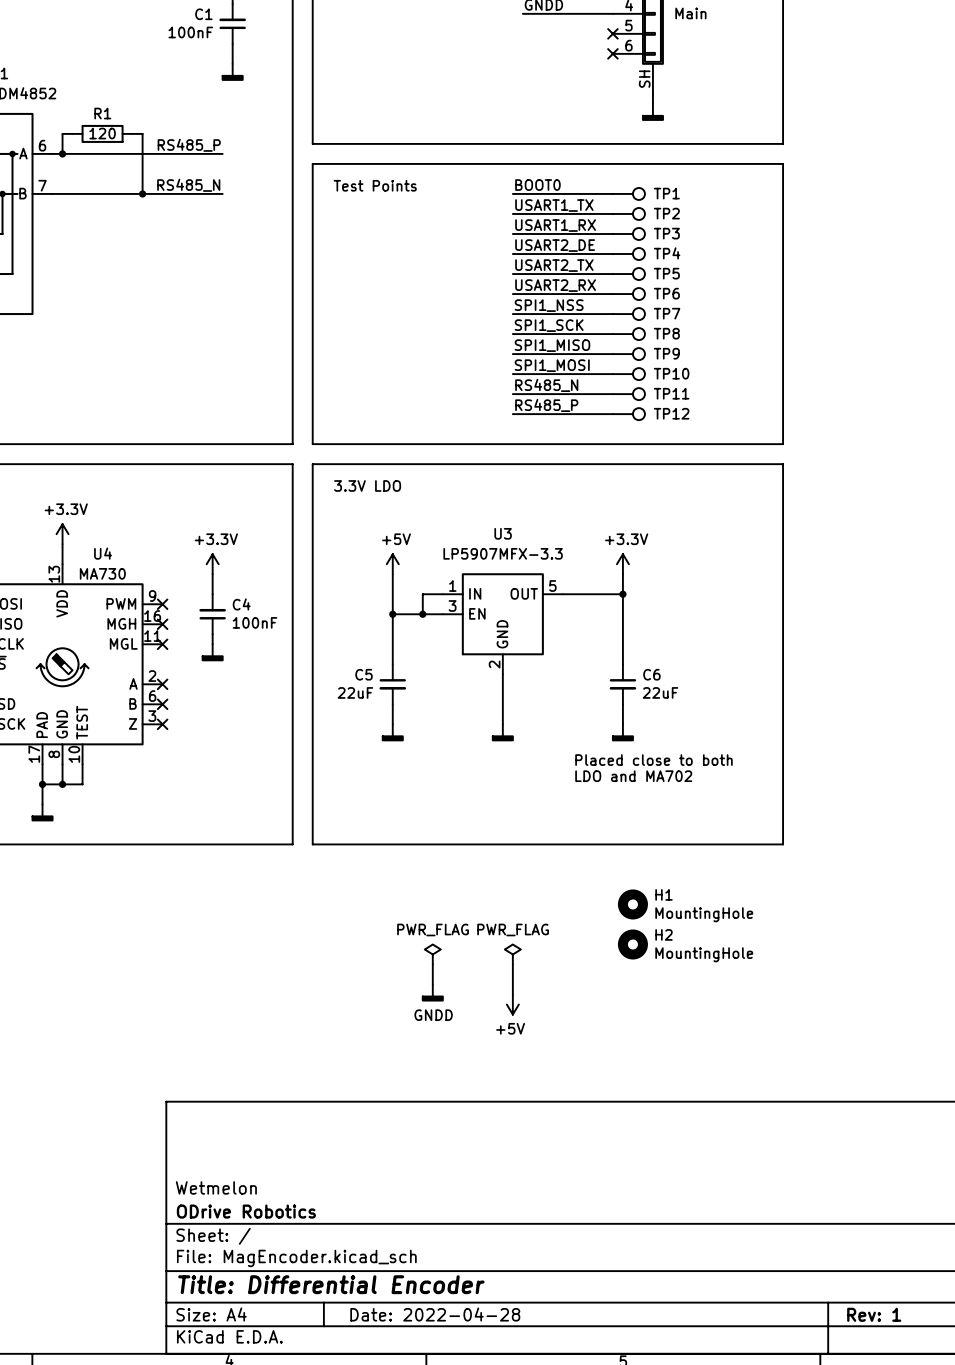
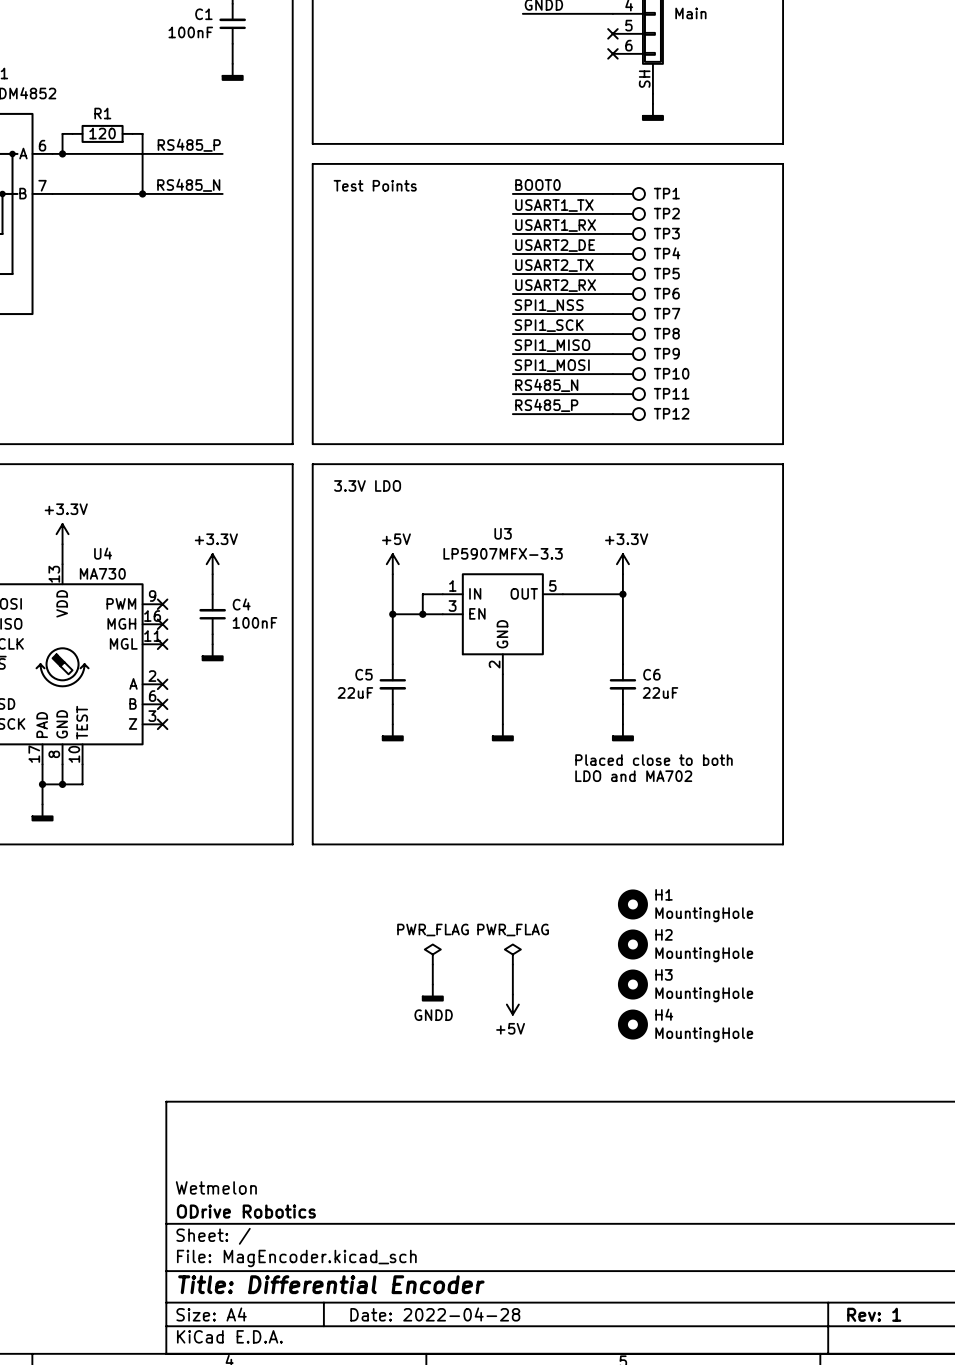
H3: none -> MountingHole (632, 984)
H4: none -> MountingHole (632, 1024)

